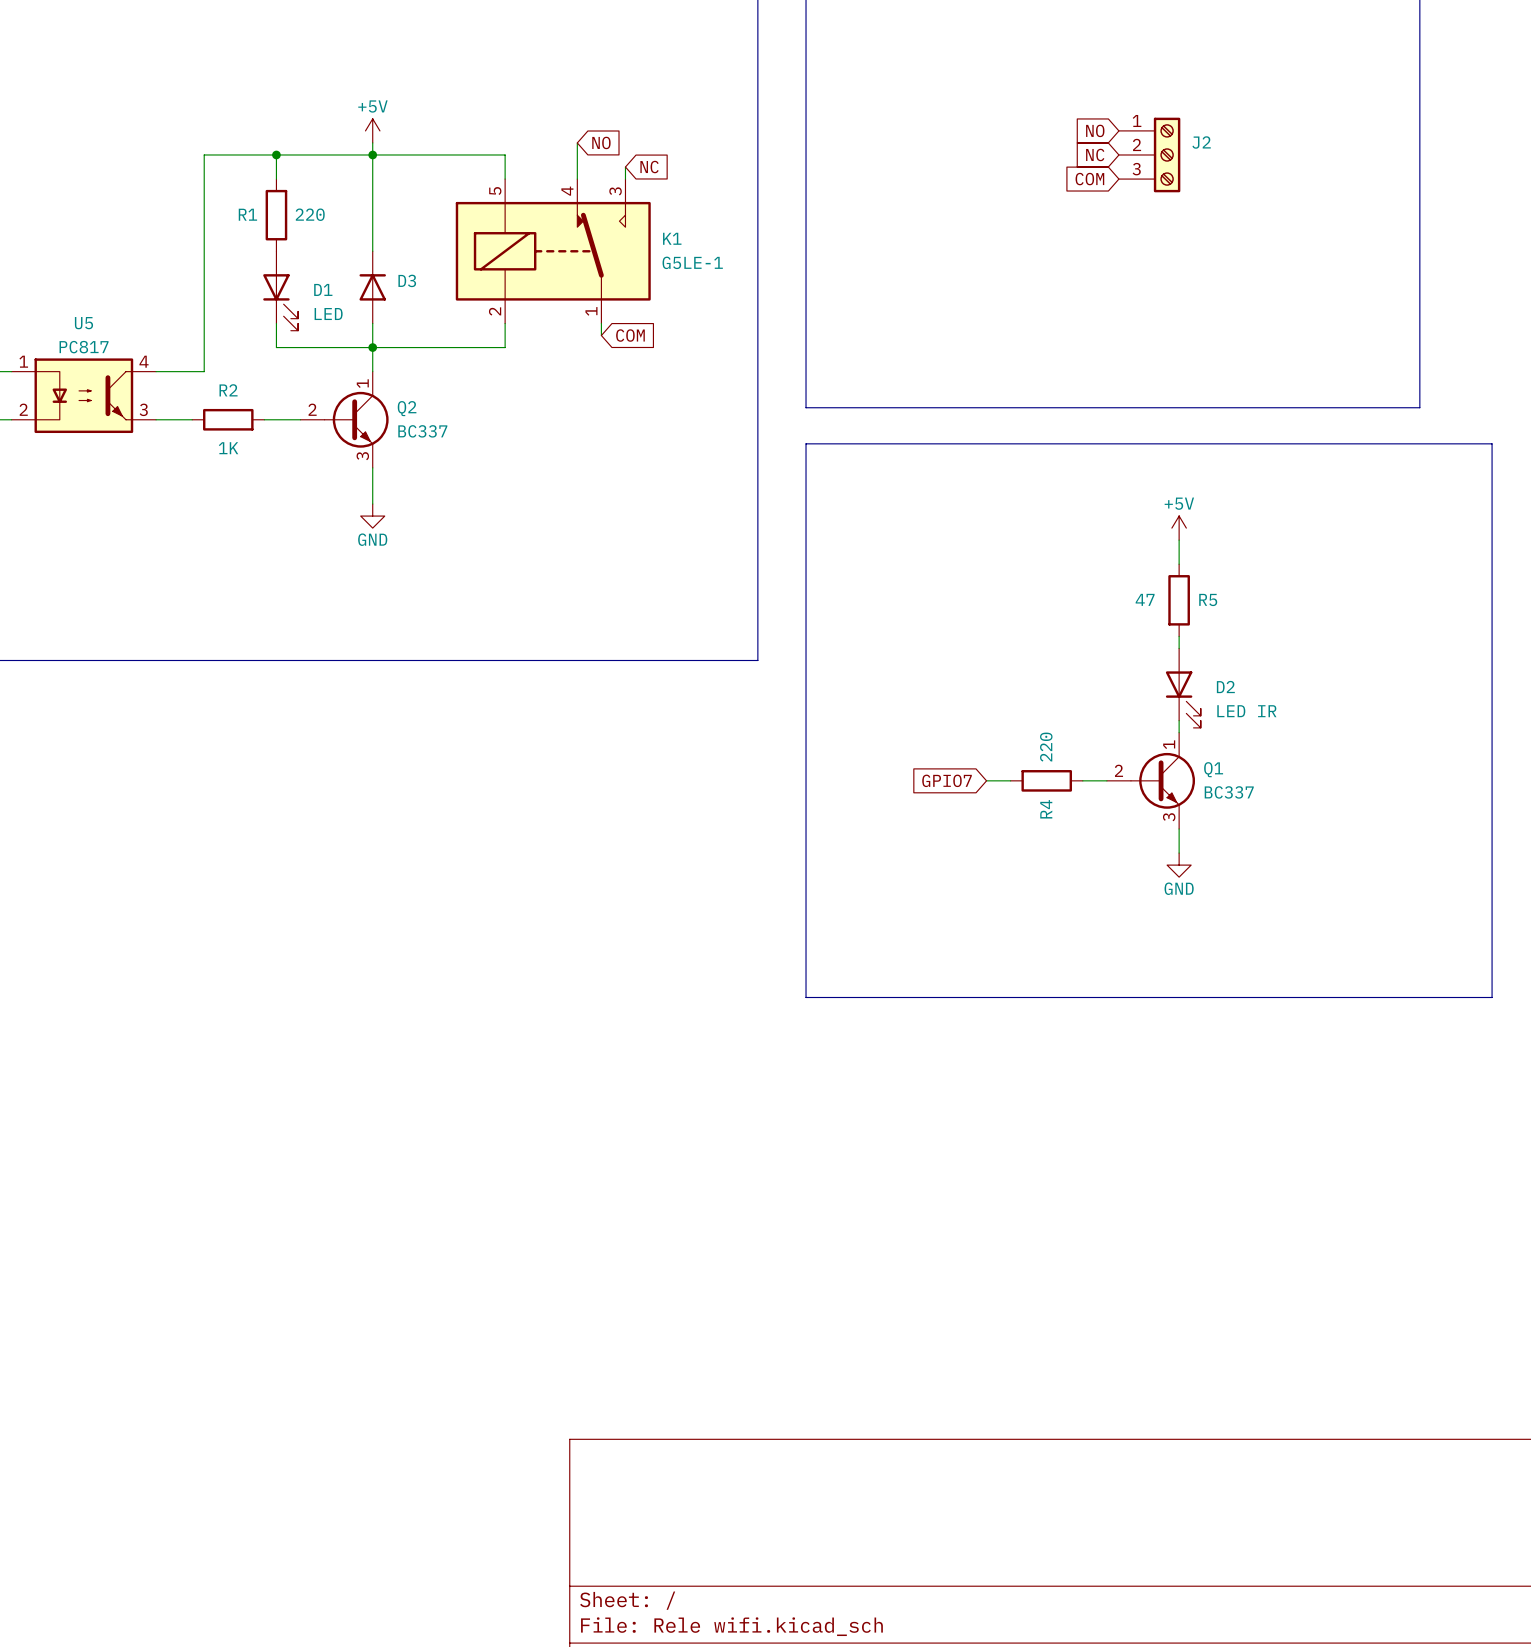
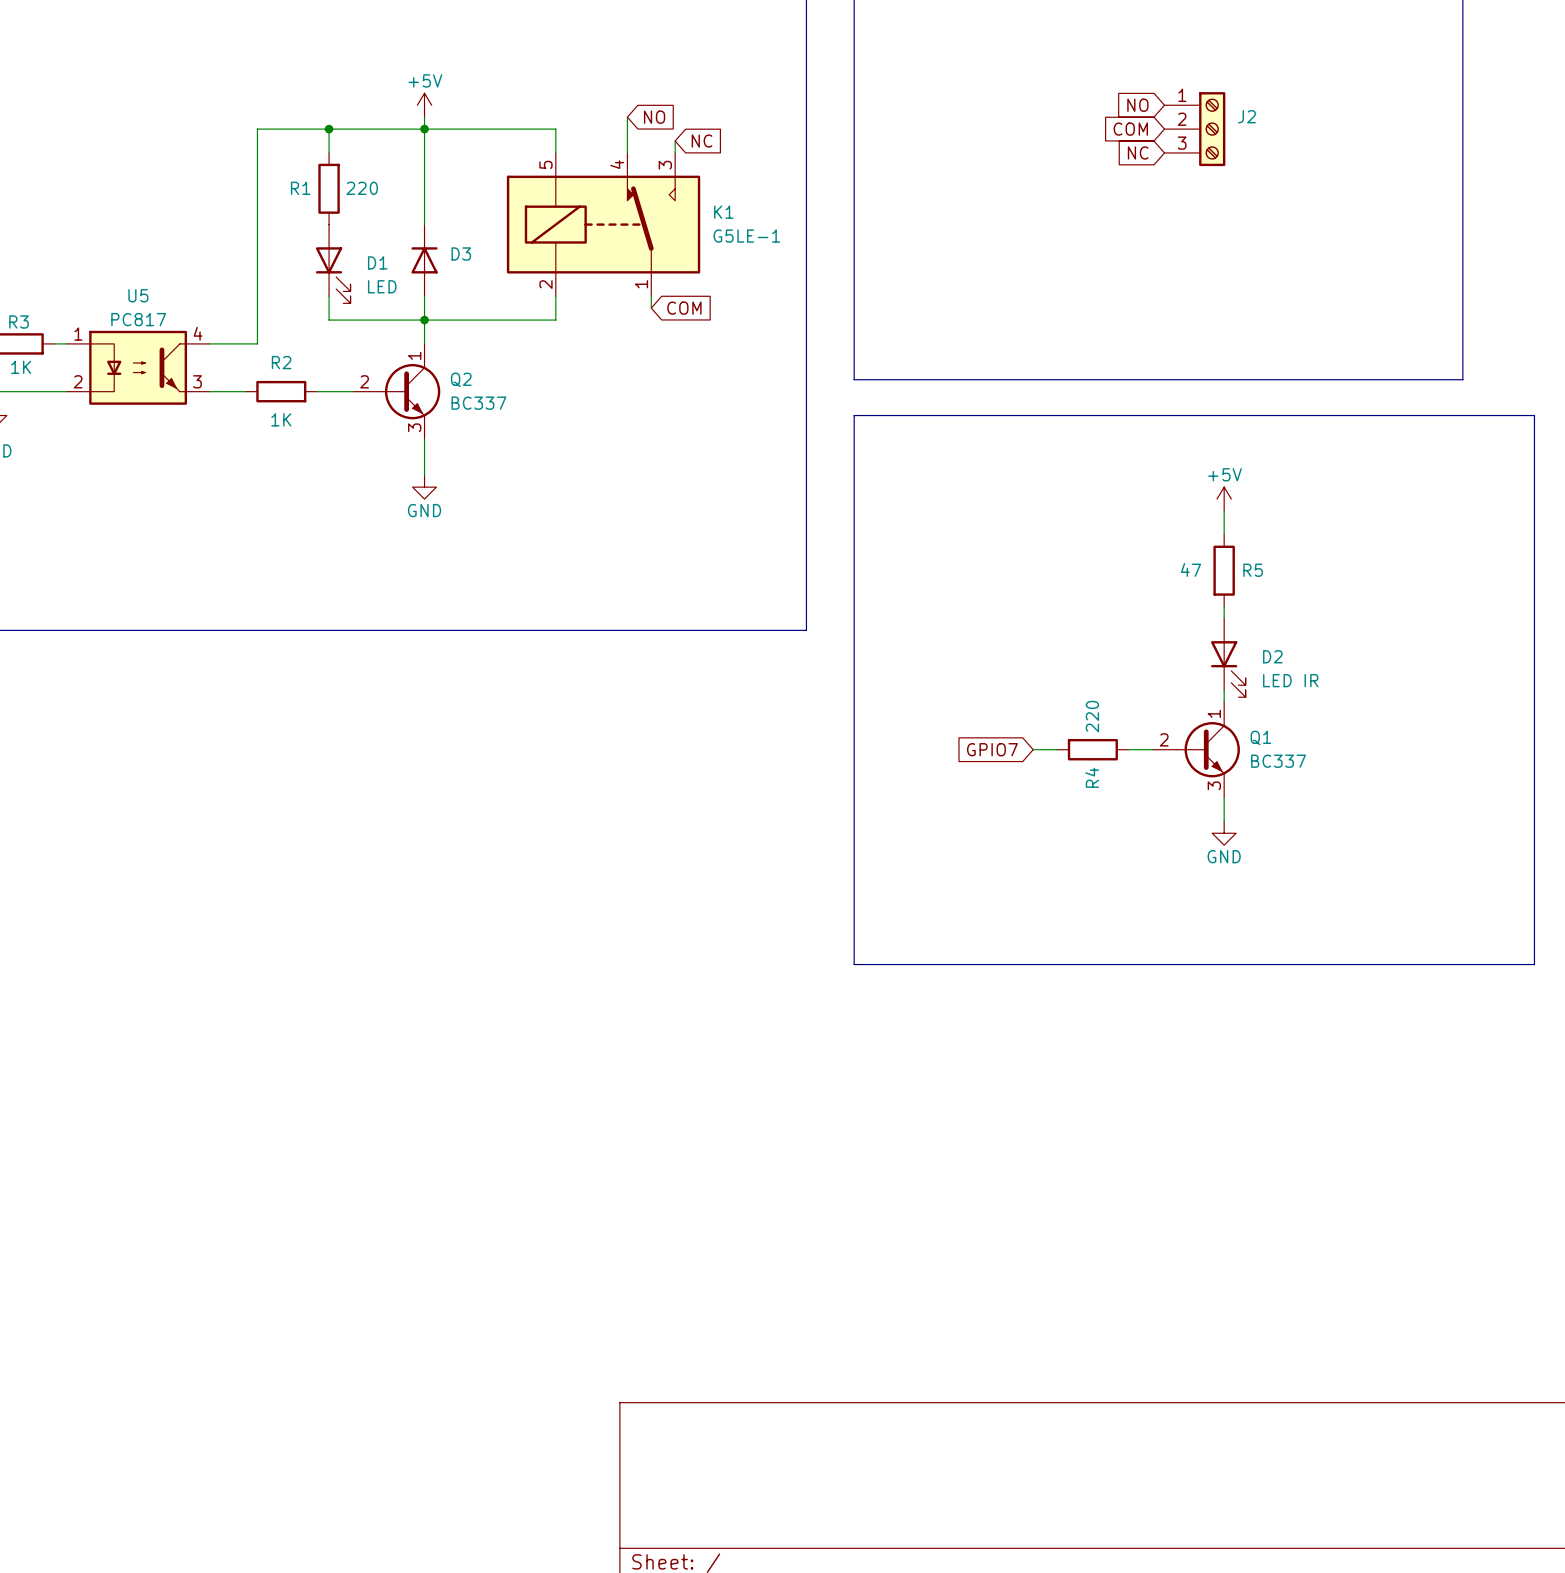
global label: NC (1095, 154) -> COM (1130, 129)
global label: COM (1089, 179) -> NC (1138, 152)

